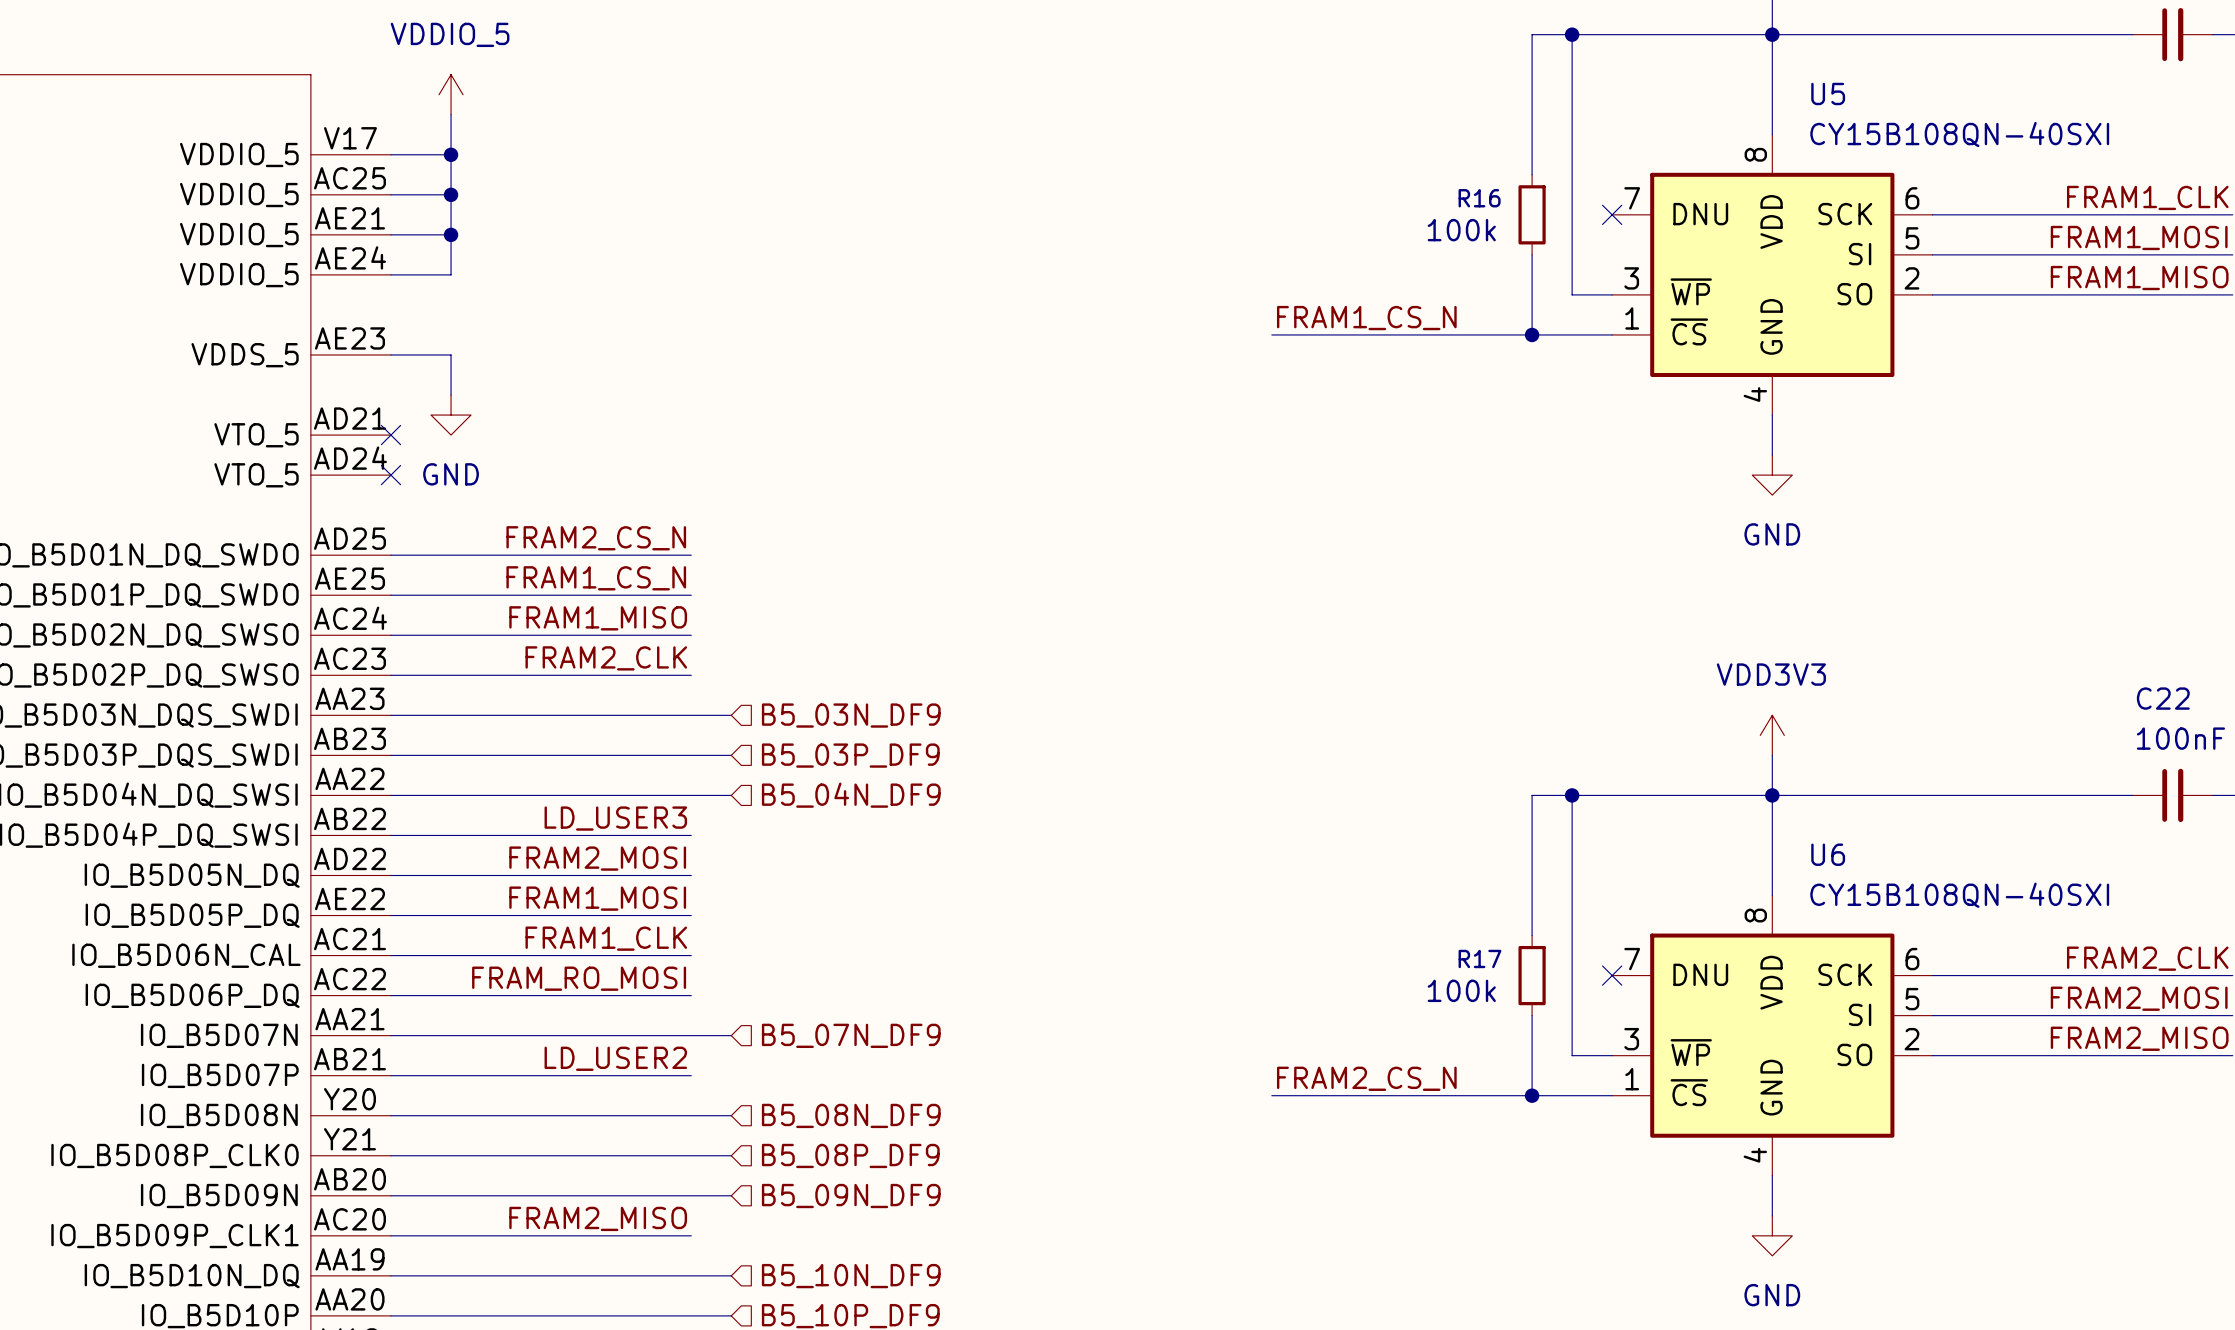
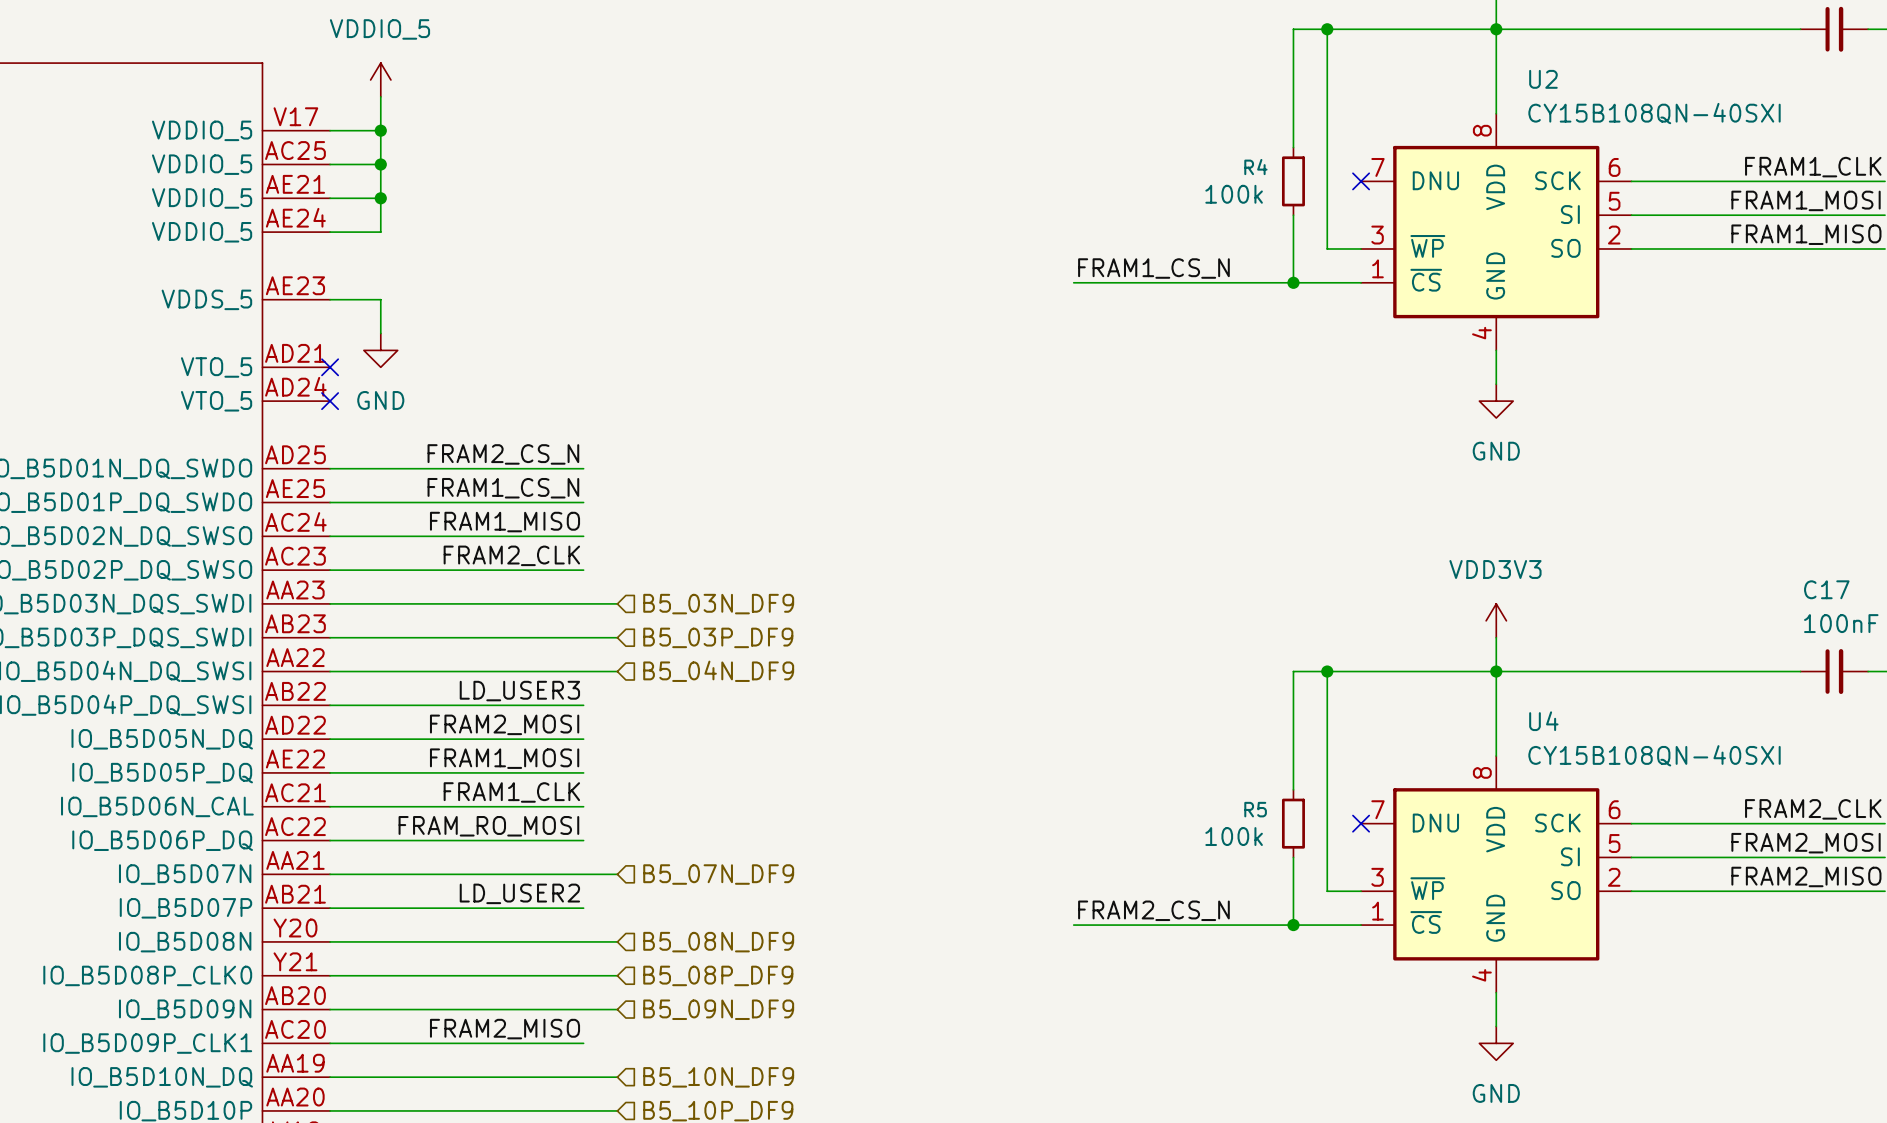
U5 name: U5 (1828, 93) -> U2 (1543, 79)
R16 name: R16 (1479, 198) -> R4 (1255, 167)
C22 name: C22 (2163, 698) -> C17 (1826, 589)
U6 name: U6 (1828, 854) -> U4 (1543, 721)
R17 name: R17 (1479, 958) -> R5 (1255, 809)

